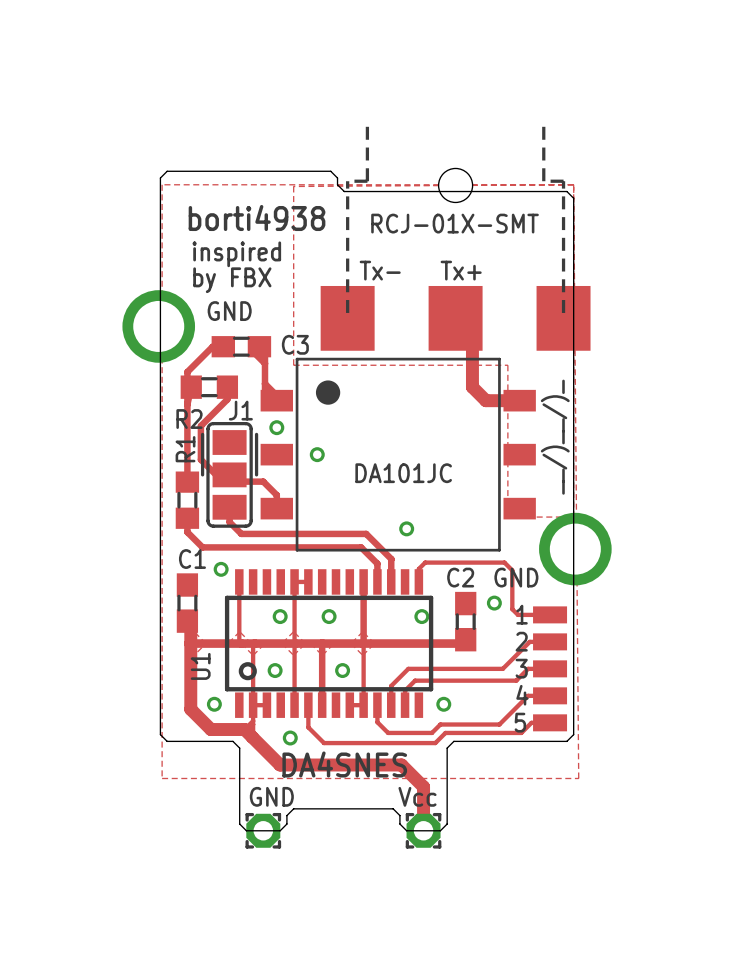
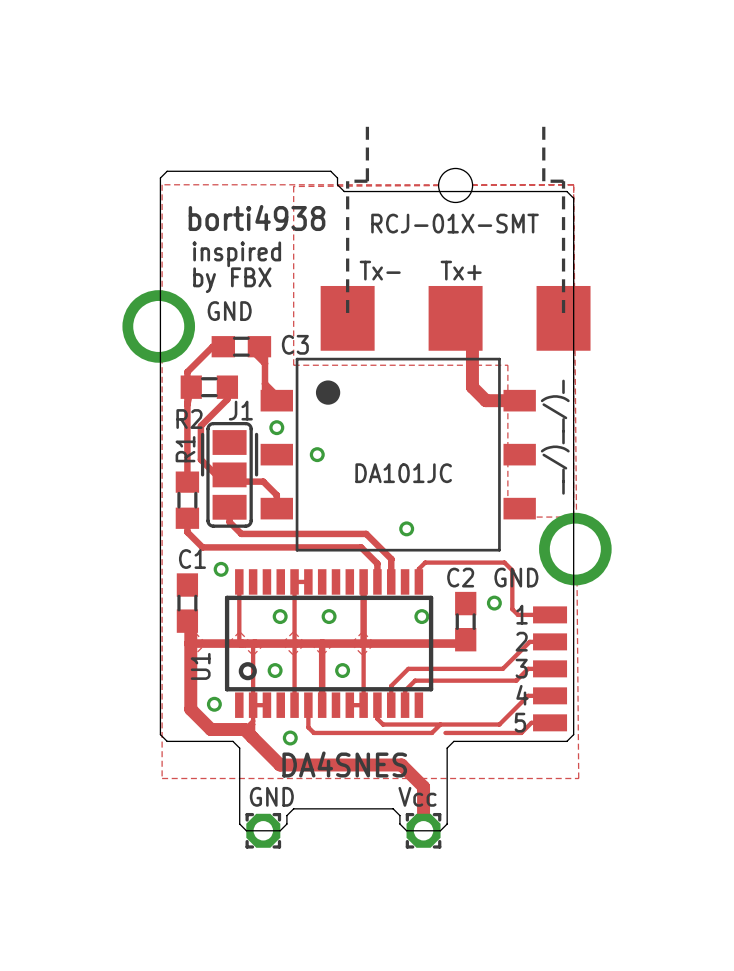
via: (443, 704) -> none
track: (377, 718) (377, 722) (388, 732) -> (377, 718) (383, 724) (440, 724)
track: (313, 732) (324, 743) (435, 743) (445, 732) -> (313, 732) (388, 732)

